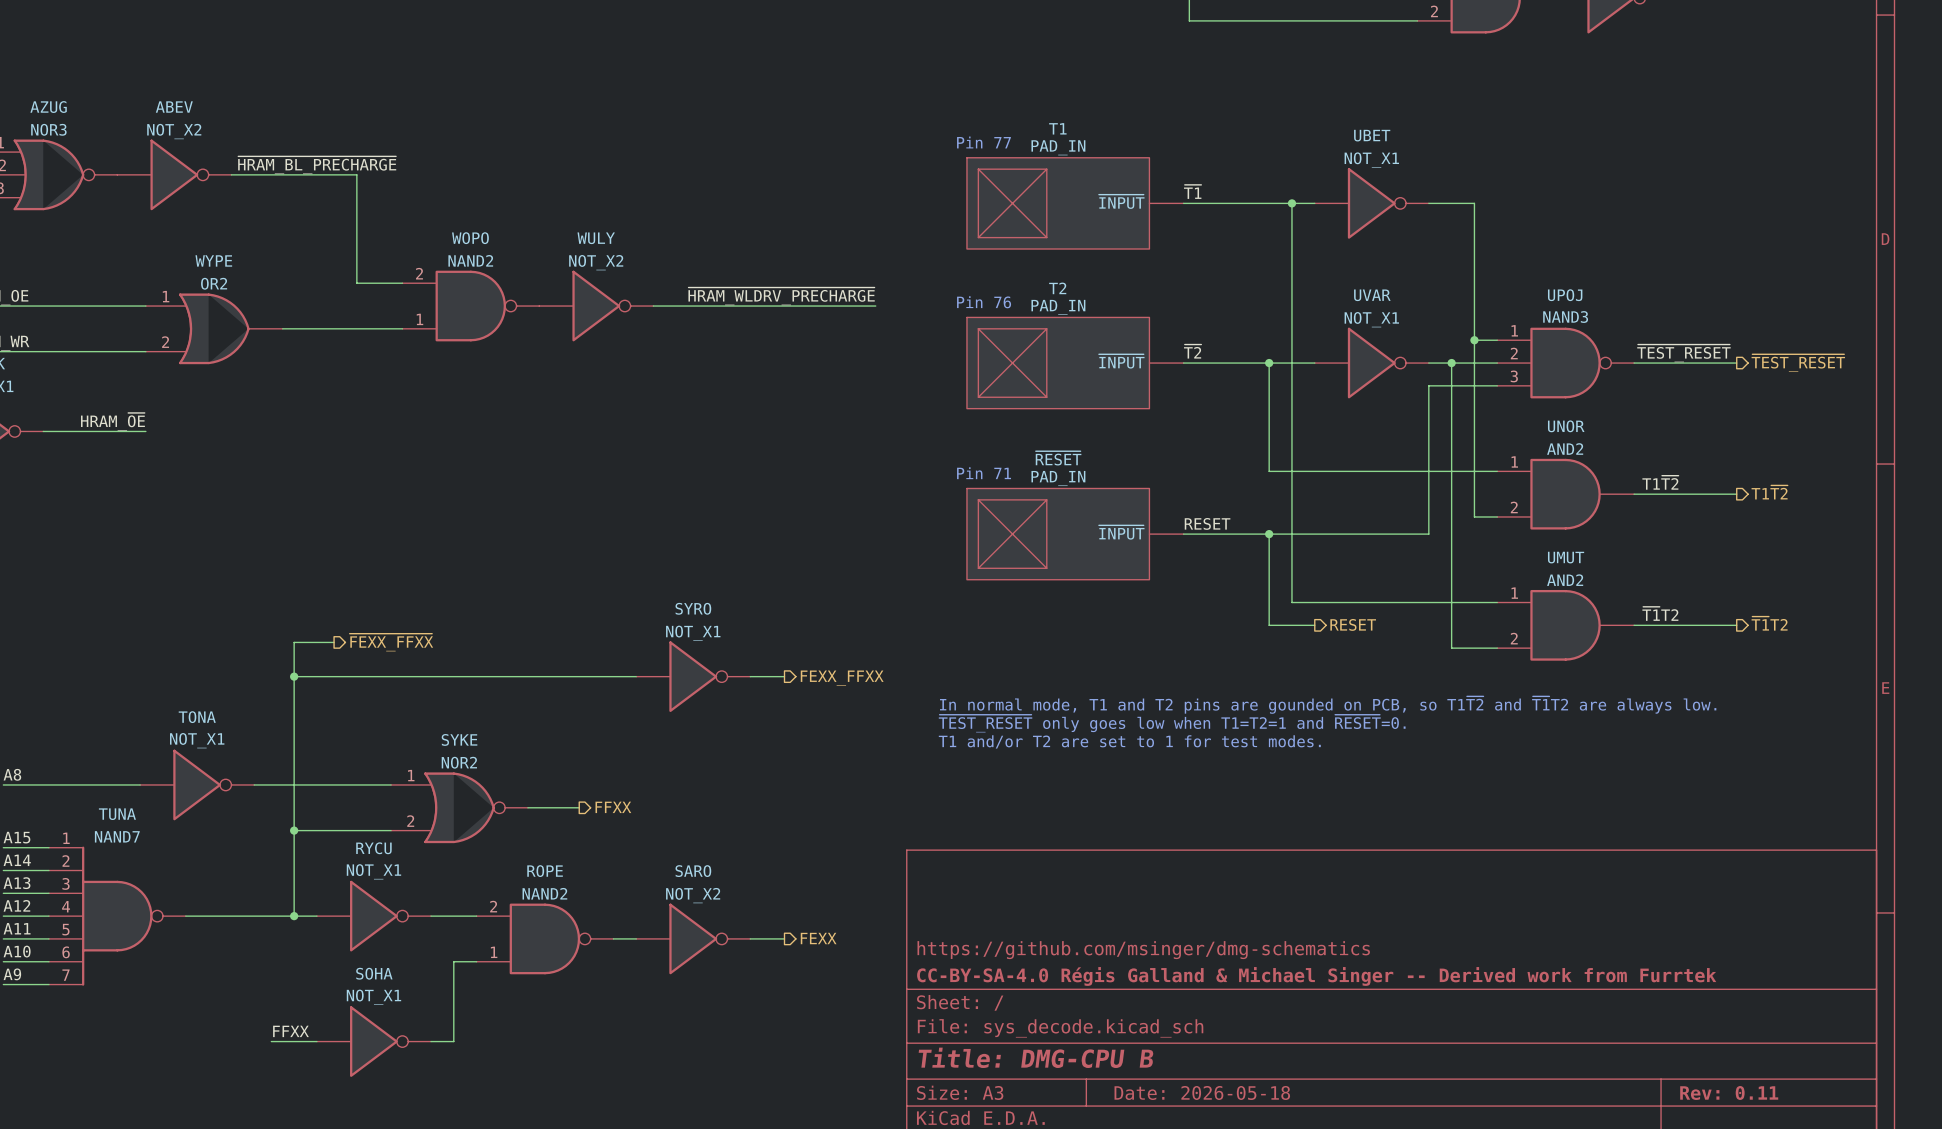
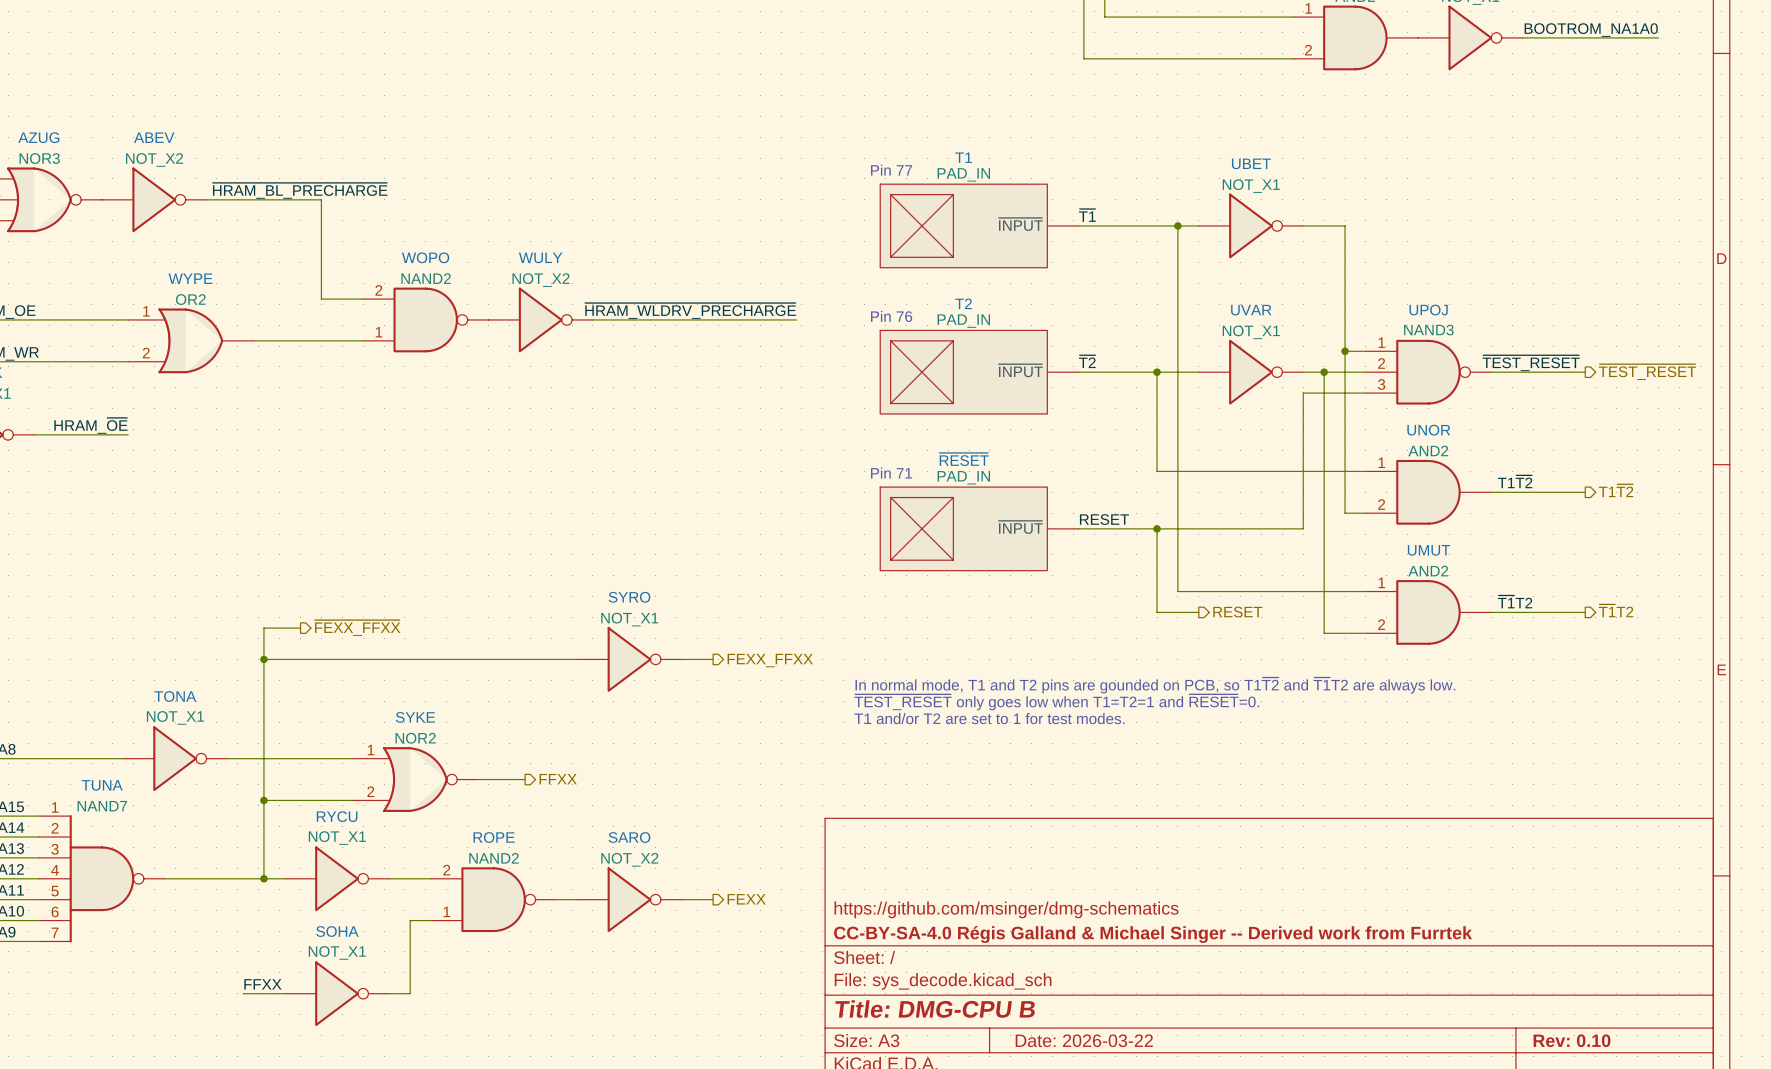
title block: Date: 2026-05-18 (1202, 1092) -> Date: 2026-03-22 (1084, 1040)
title block: Rev: 0.11 (1729, 1092) -> Rev: 0.10 (1572, 1040)

